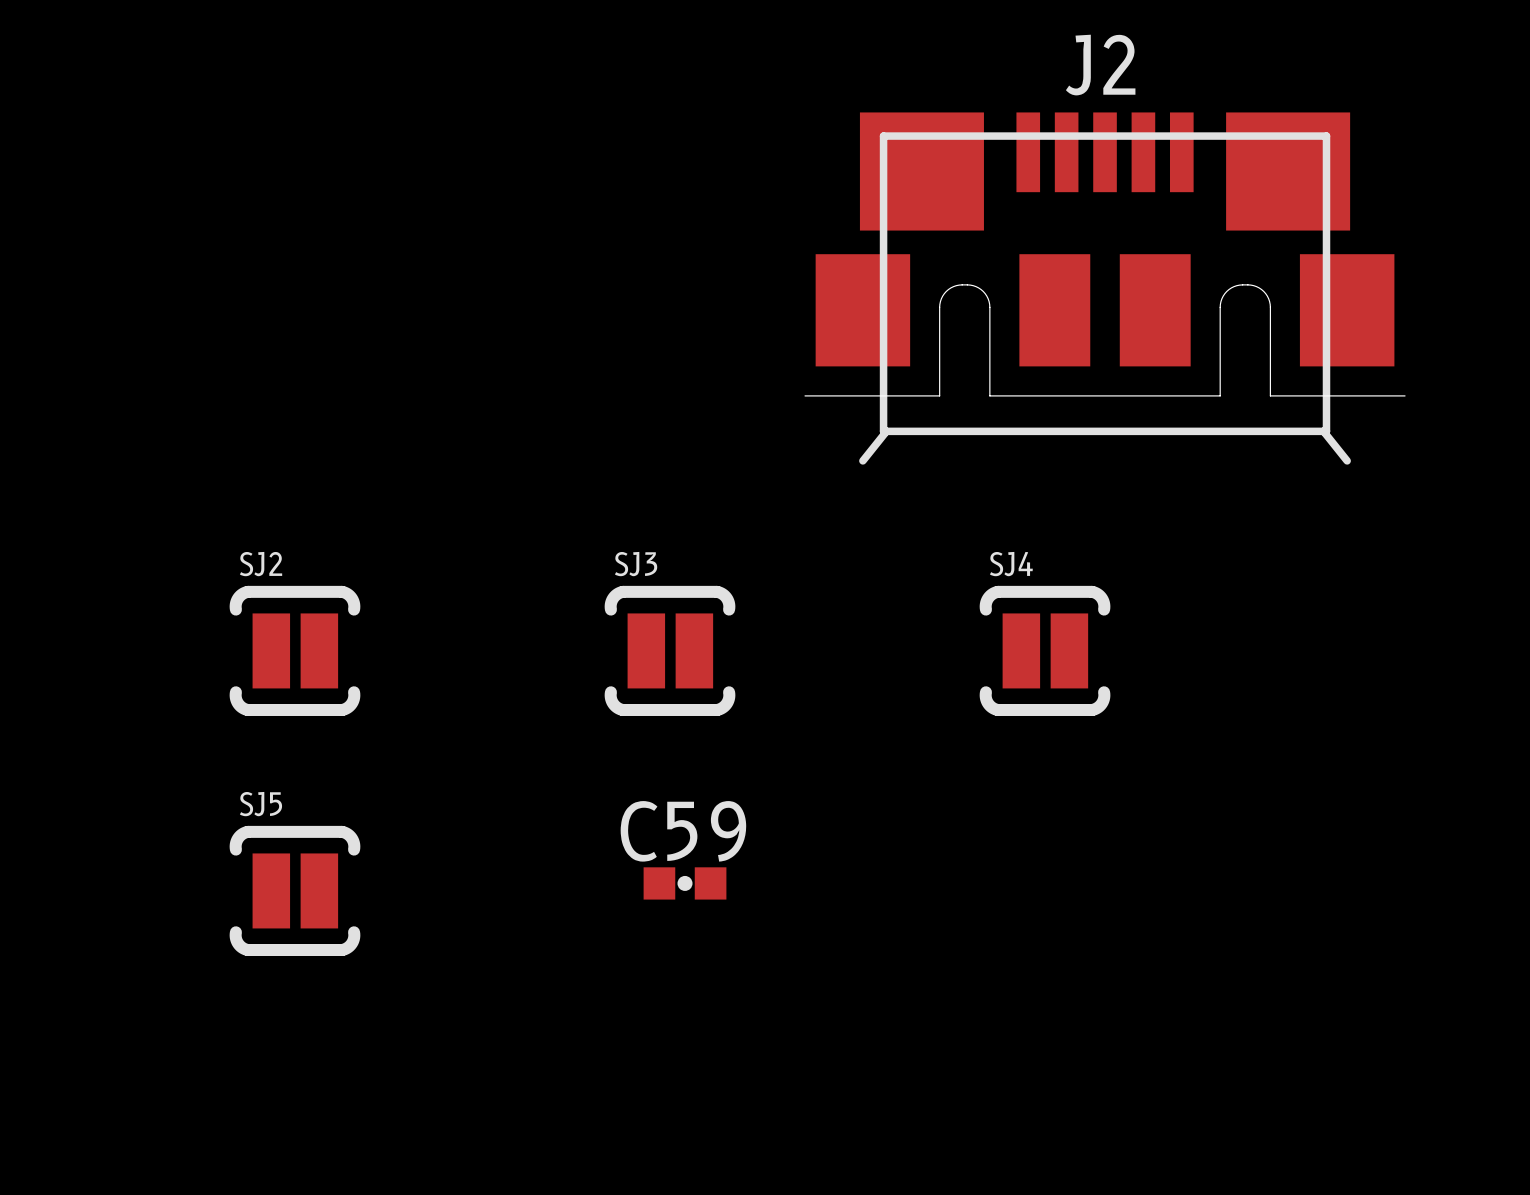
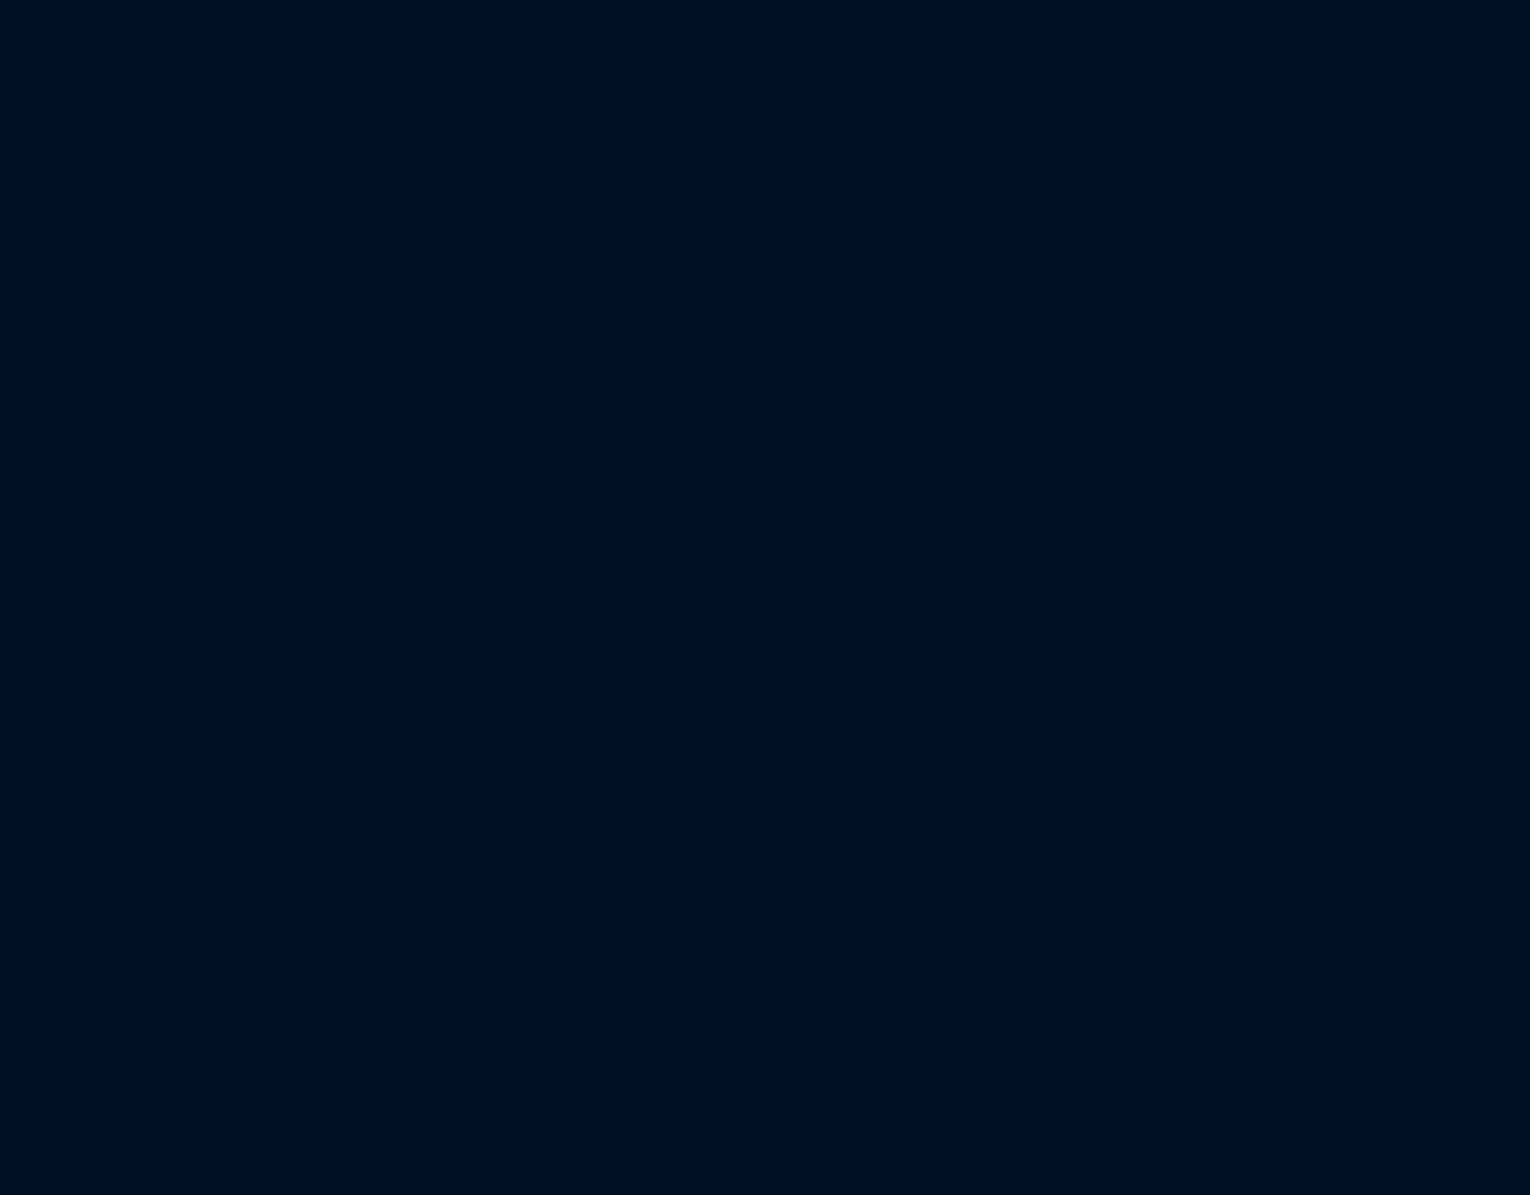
J2: (1105, 288) -> none
SJ2: (294, 650) -> none
SJ3: (670, 650) -> none
SJ4: (1045, 650) -> none
C59: (685, 883) -> none
SJ5: (294, 890) -> none

